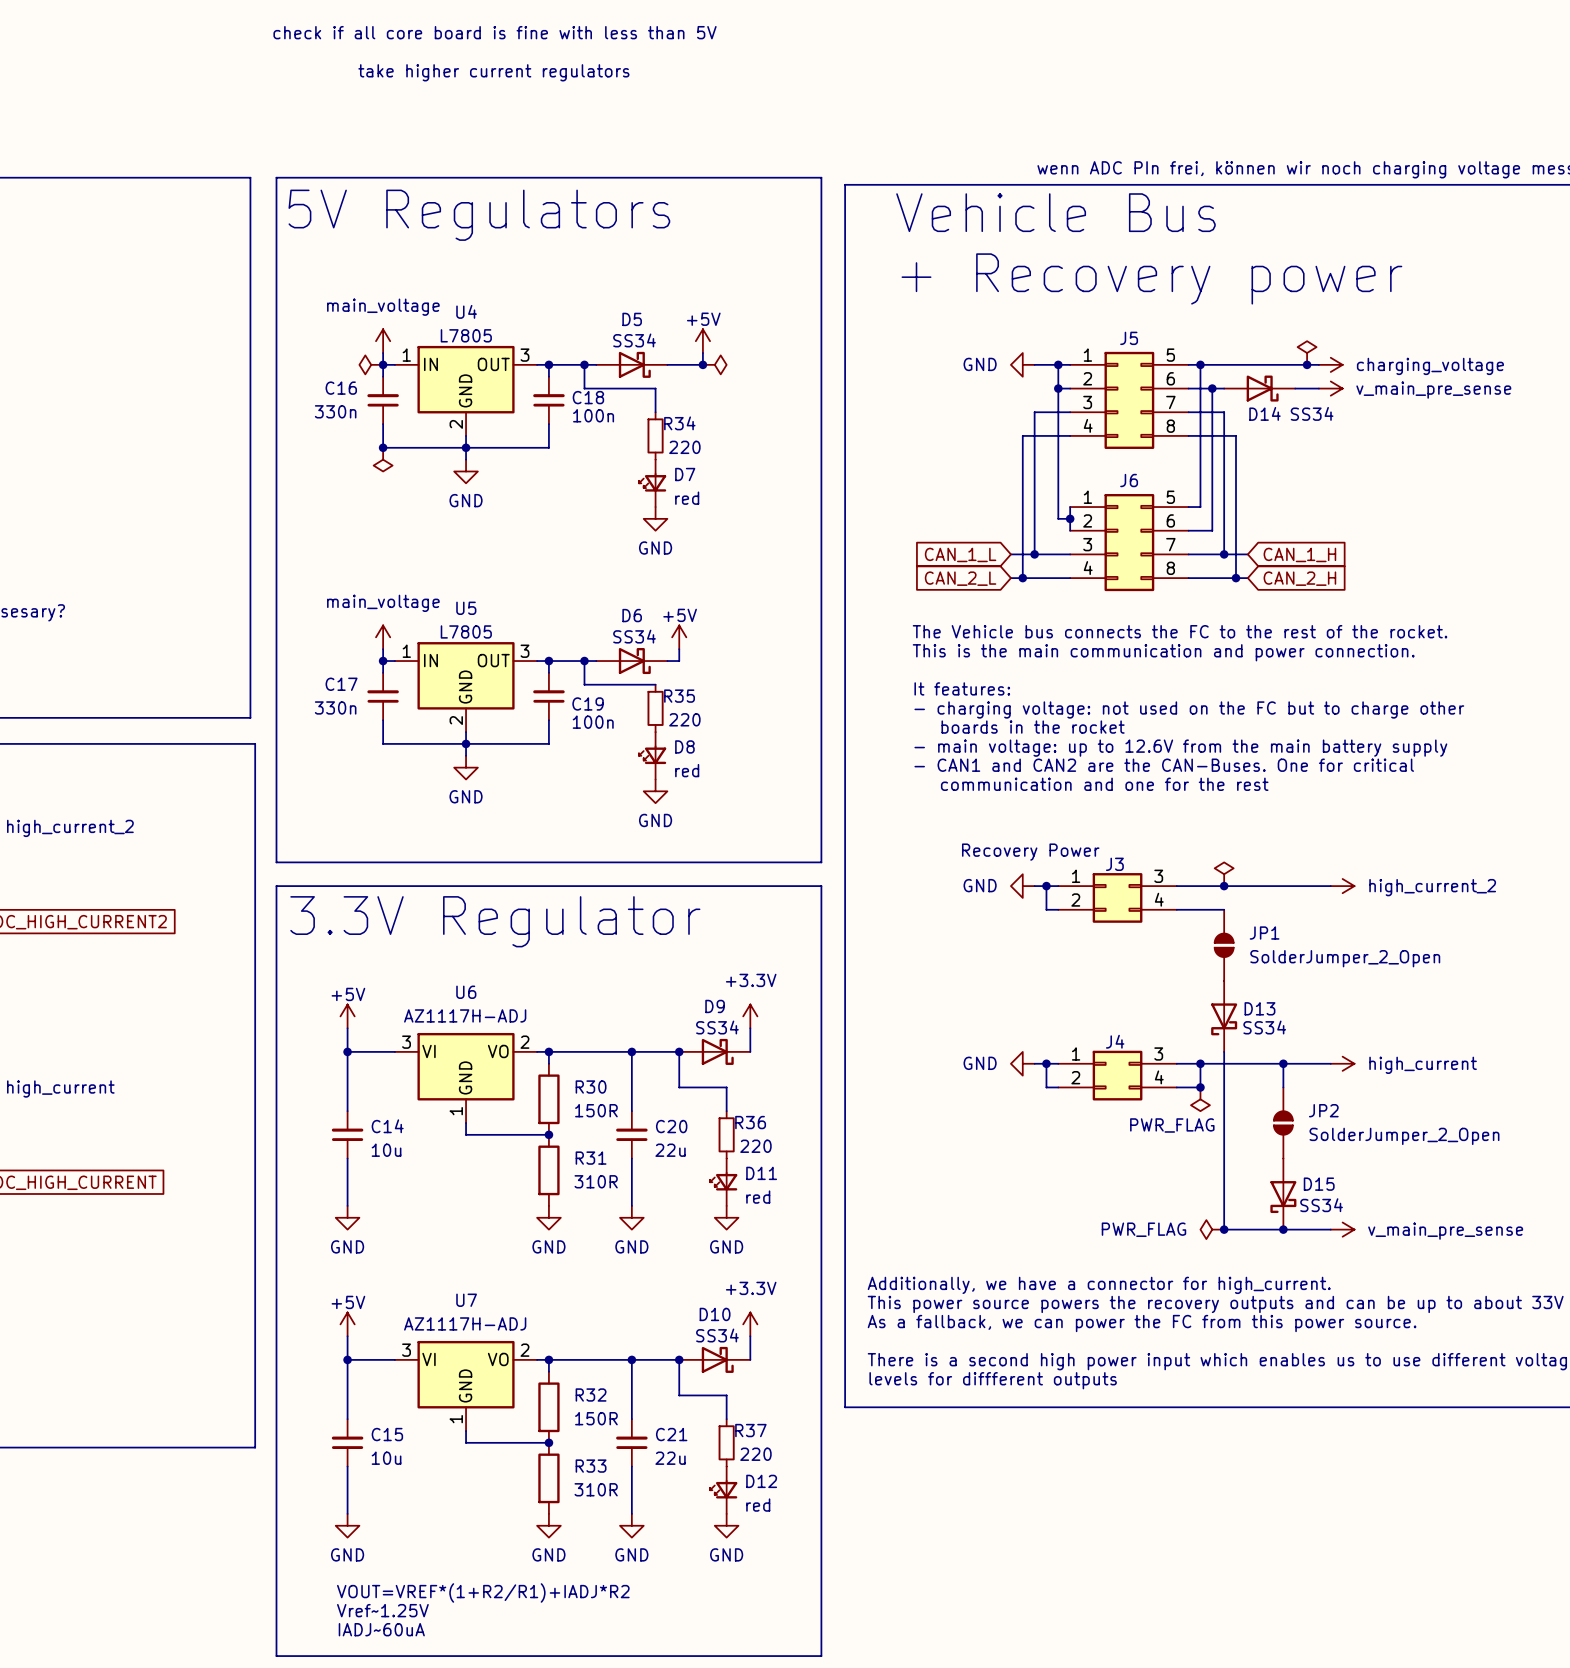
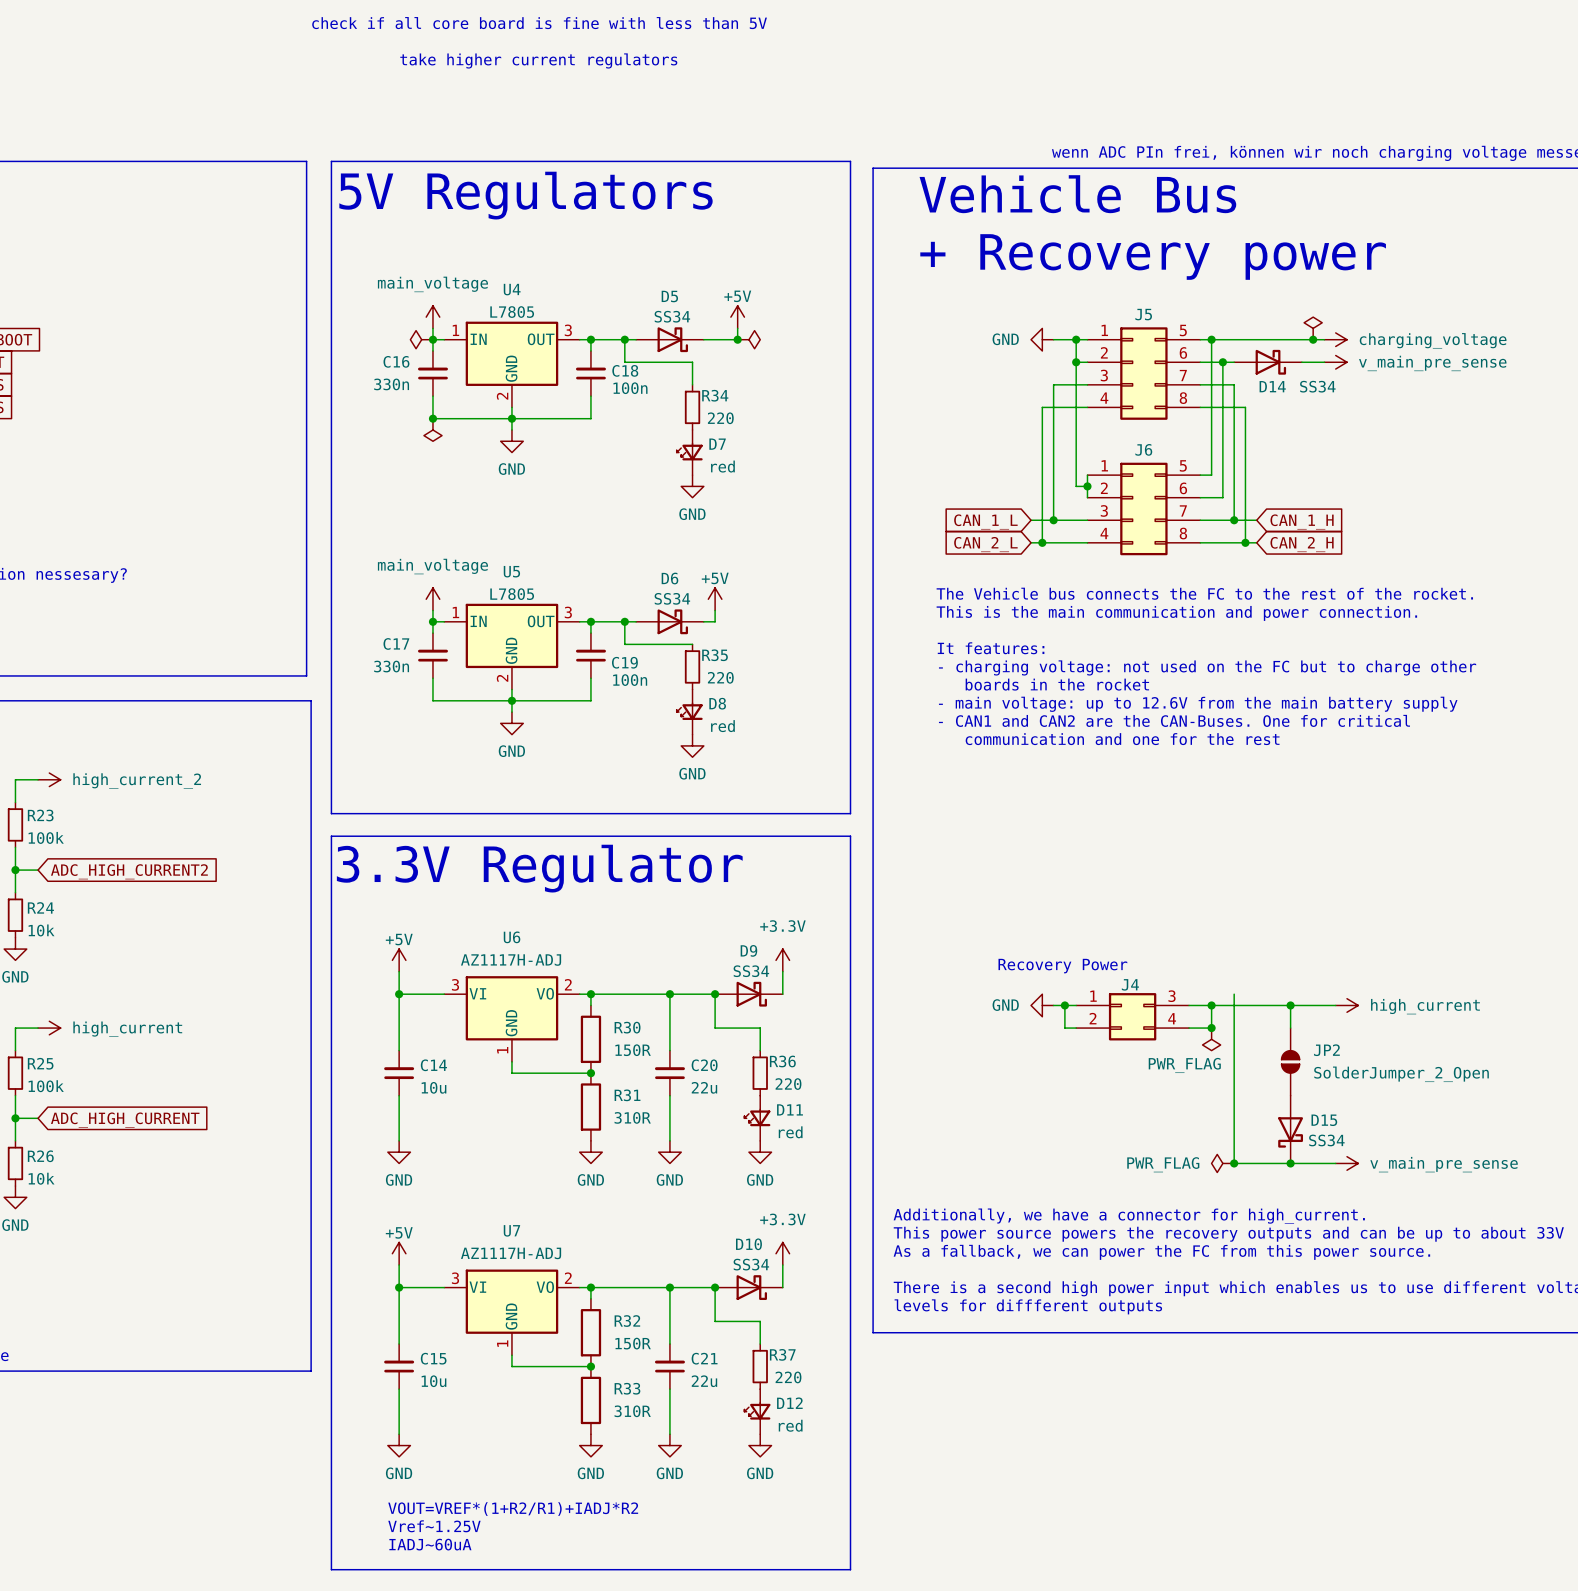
text position: Recovery Power (1030, 852) -> Recovery Power (1062, 966)
power symbol: (1224, 874) -> none
power symbol: GND (1022, 886) -> none
wire: (1034, 886) (1058, 886) -> none
wire: (1046, 886) (1046, 909) (1058, 909) -> none
junction: (1046, 886) -> none
wire: (1176, 886) (1330, 886) -> none
junction: (1224, 886) -> none
power symbol: high_current_2 (1342, 886) -> none
J3: (1117, 897) -> none
wire: (1176, 909) (1224, 909) -> none
JP1: SolderJumper_2_Open (1224, 945) -> none
D13: SS34 (1224, 1016) -> none

